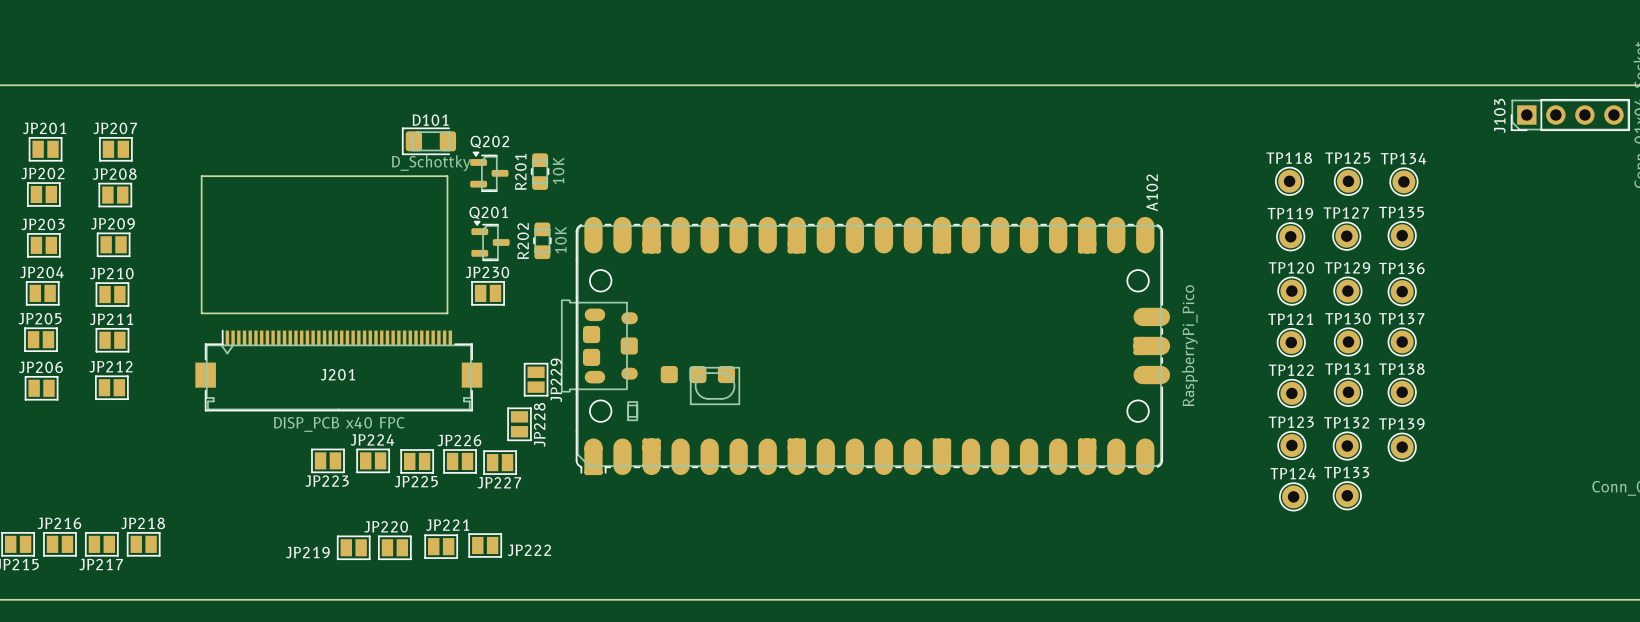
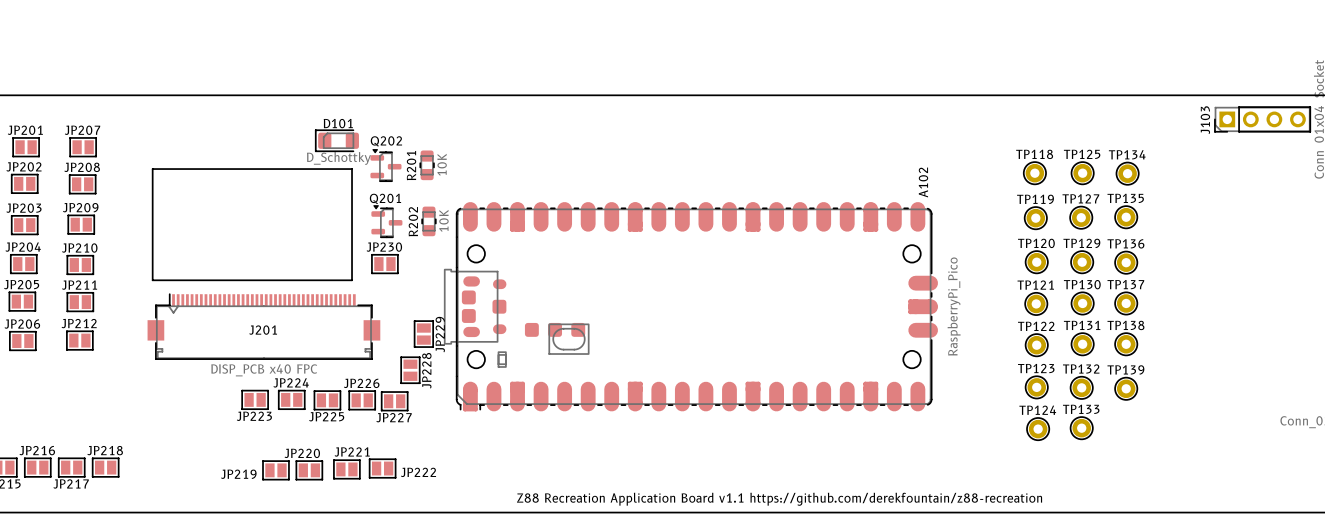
text: none -> Z88 Recreation Application Board v1.1 https://github.com/derekfountain/z88-recreation (779, 499)

